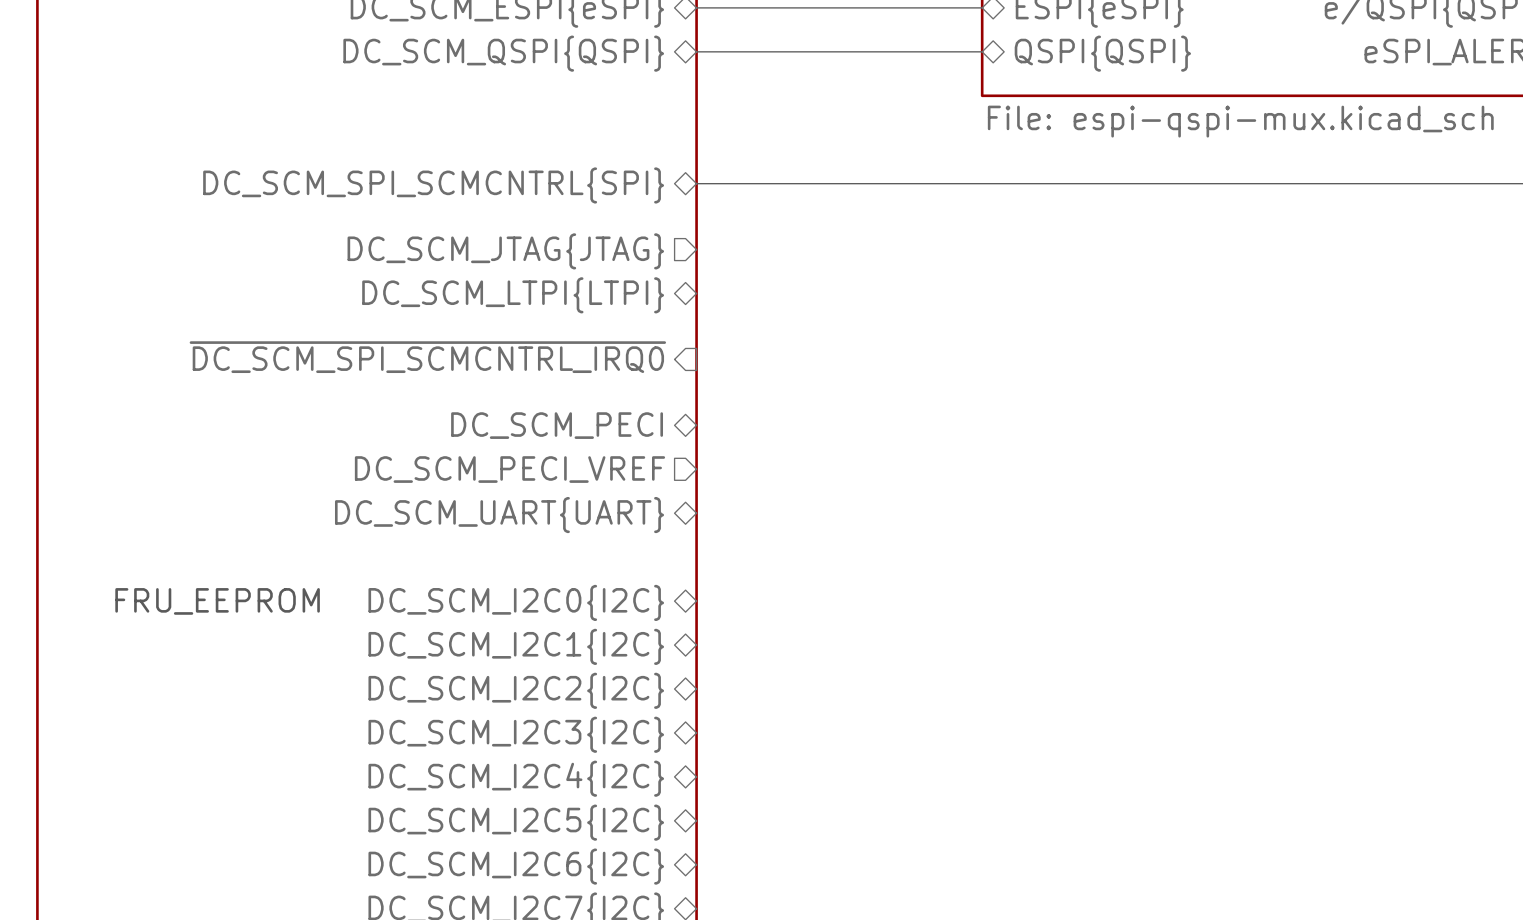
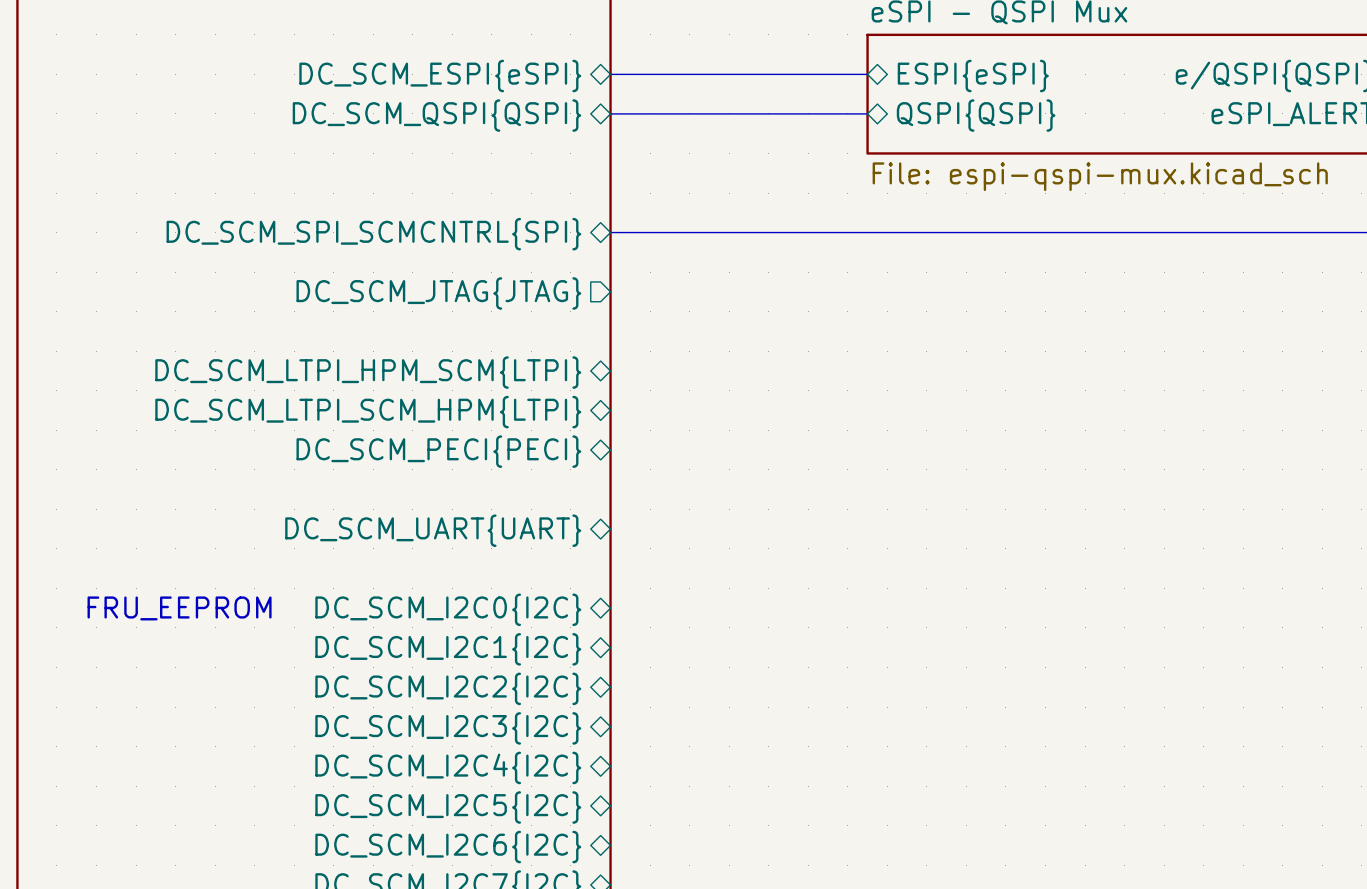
sheet pin: DC_SCM_LTPI{LTPI} (513, 295) -> none
sheet pin: none -> DC_SCM_LTPI_HPM_SCM{LTPI} (368, 372)
sheet pin: ~{DC_SCM_SPI_SCMCNTRL_IRQ0} (427, 357) -> none
sheet pin: none -> DC_SCM_LTPI_SCM_HPM{LTPI} (368, 412)
sheet pin: DC_SCM_PECI (557, 425) -> DC_SCM_PECI{PECI} (438, 451)
sheet pin: DC_SCM_PECI_VREF (509, 469) -> none

